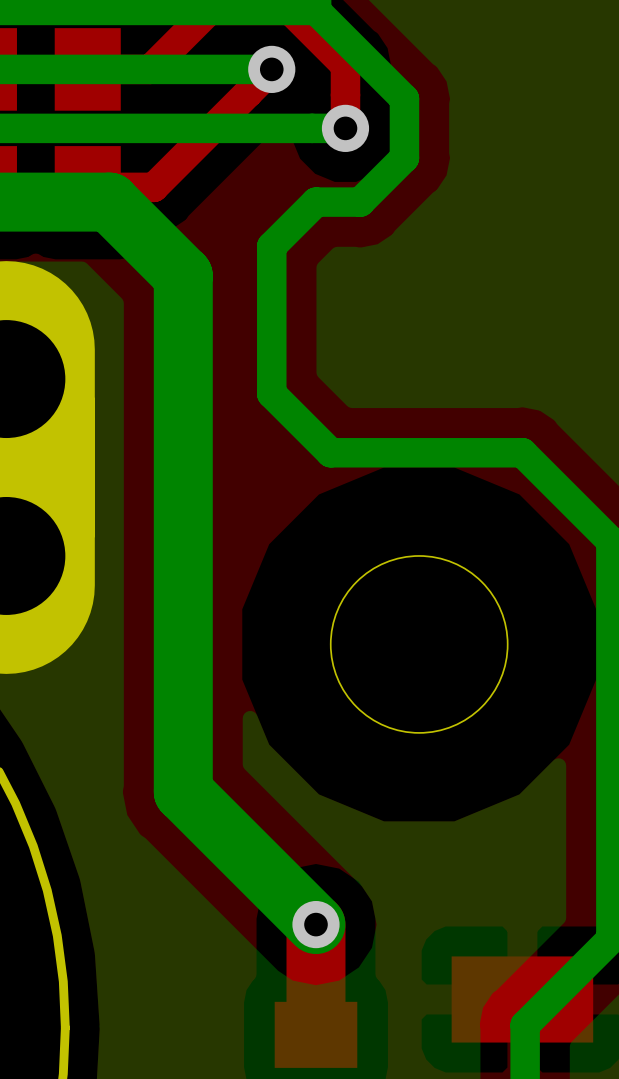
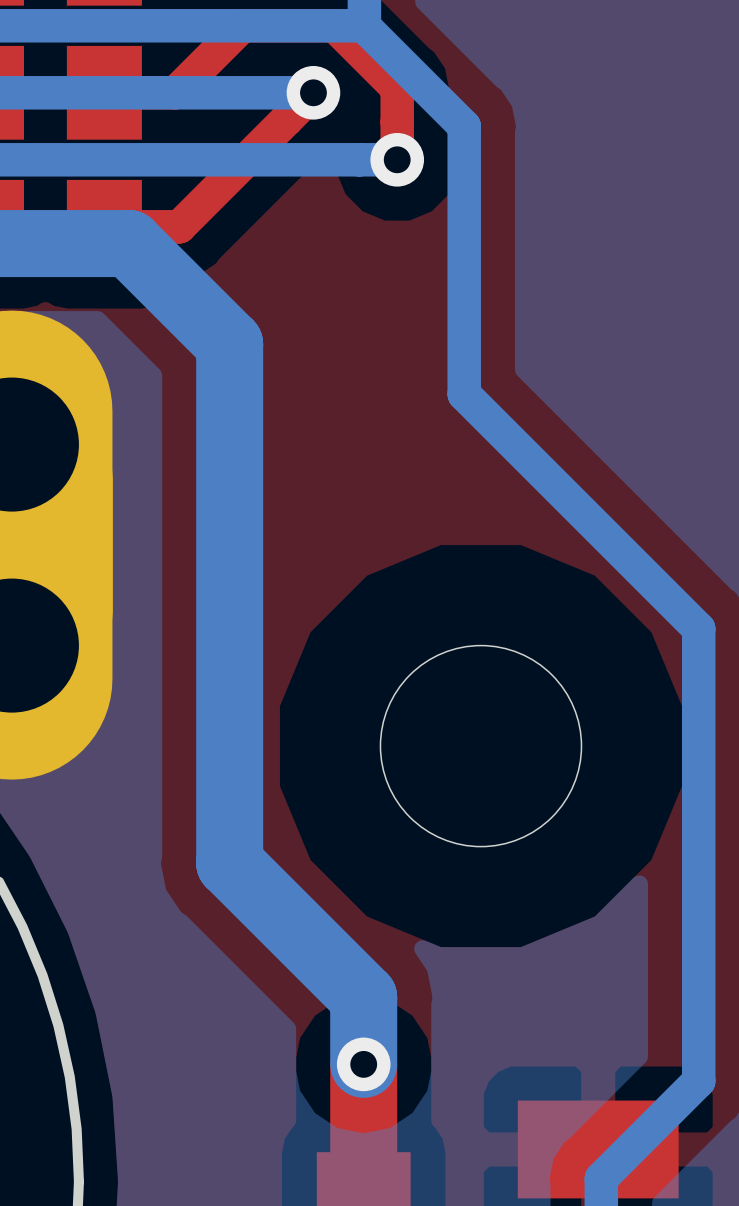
bottom track: (404, 157) (360, 202) (315, 202) (271, 246) (271, 393) (330, 452) (522, 452) -> (464, 193) (464, 394) (598, 528)
bottom track: (183, 275) (183, 791) (315, 924) -> (212, 327) (229, 344) (229, 863) (363, 997) (363, 1064)

